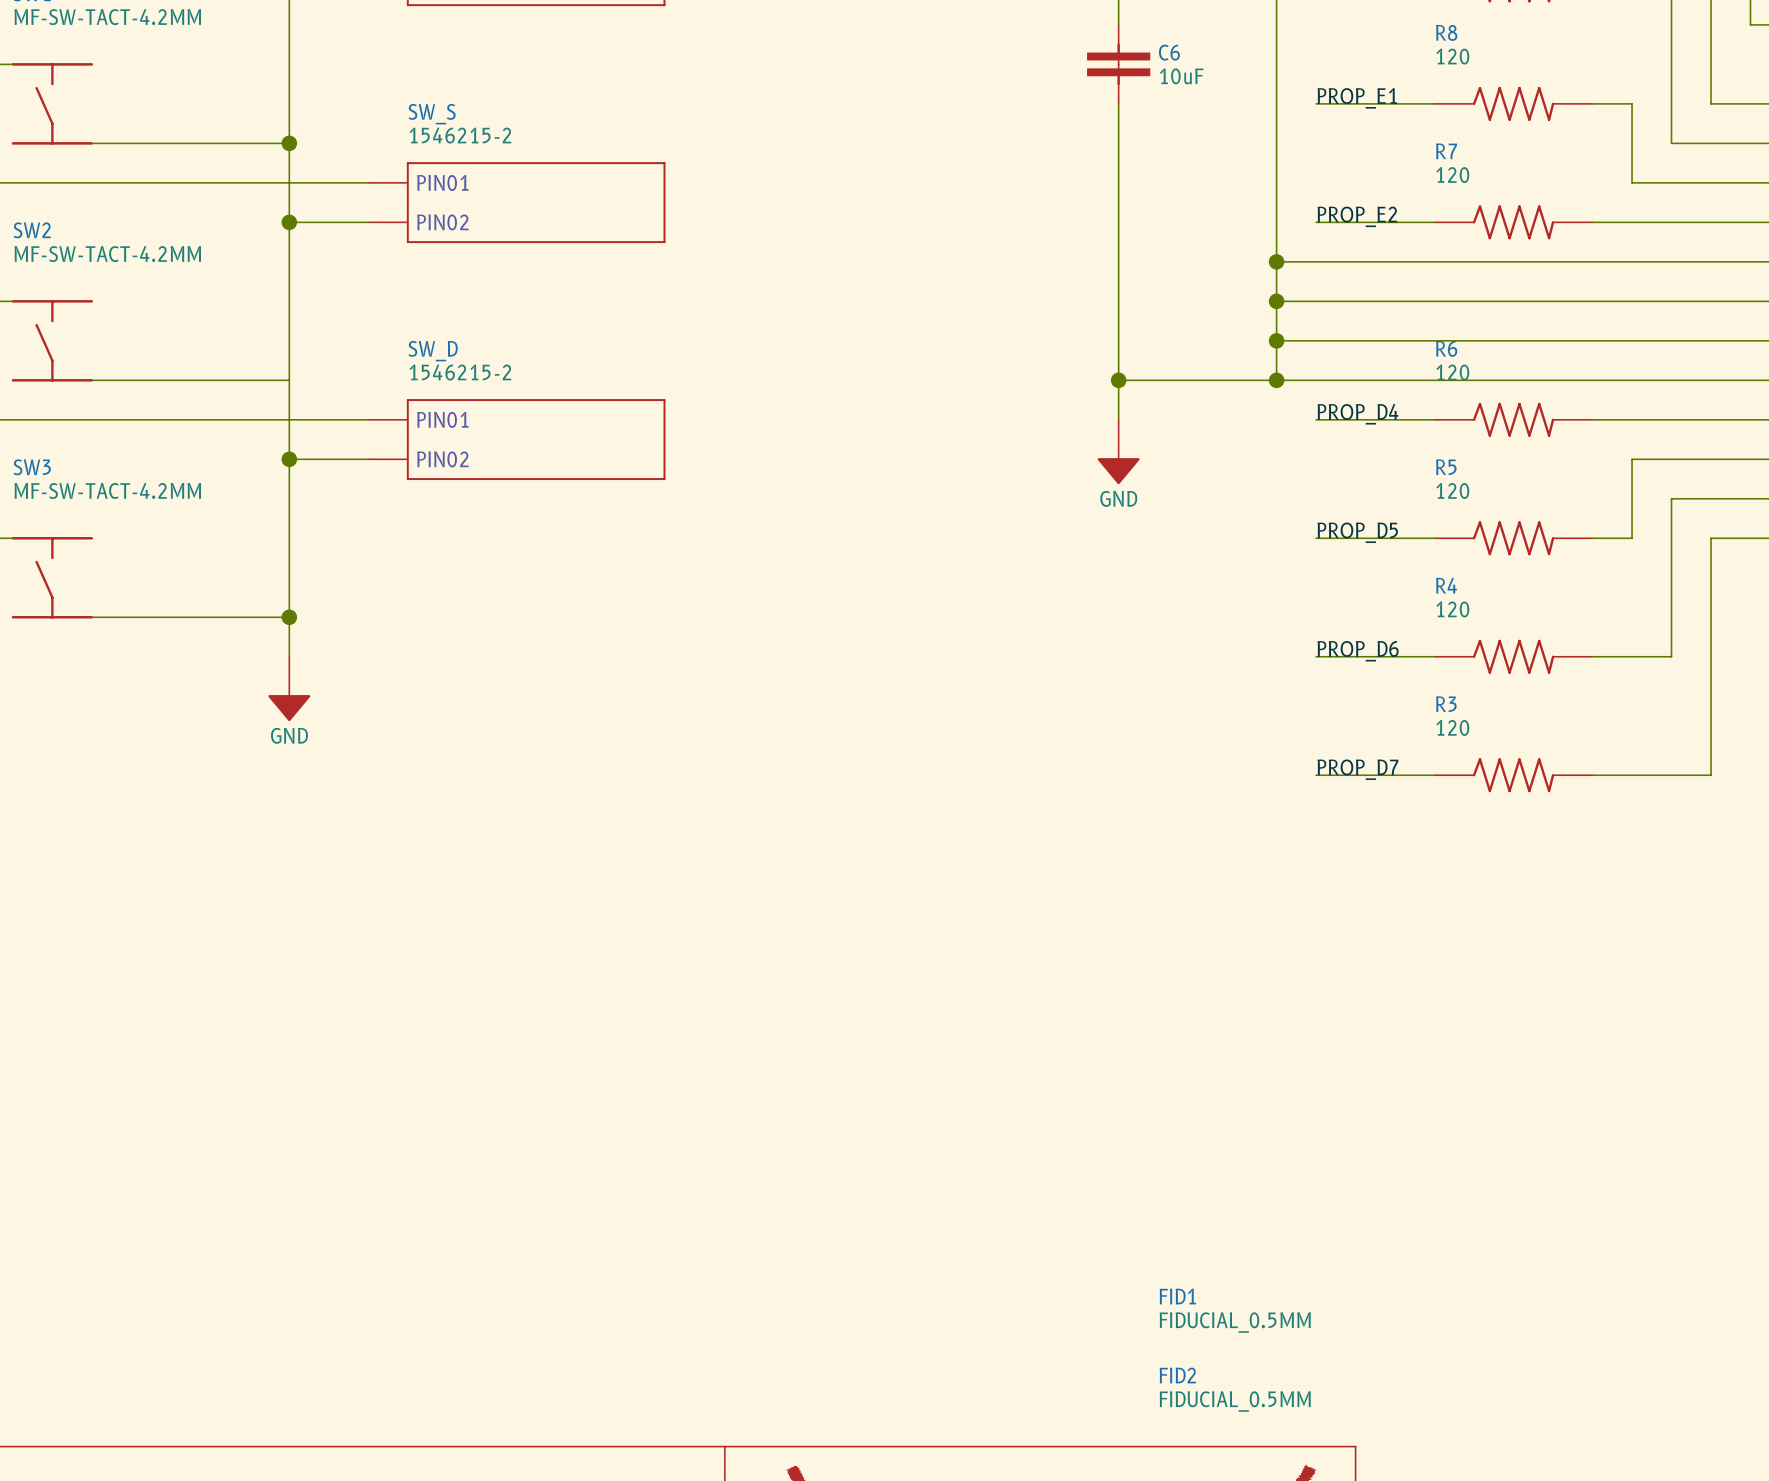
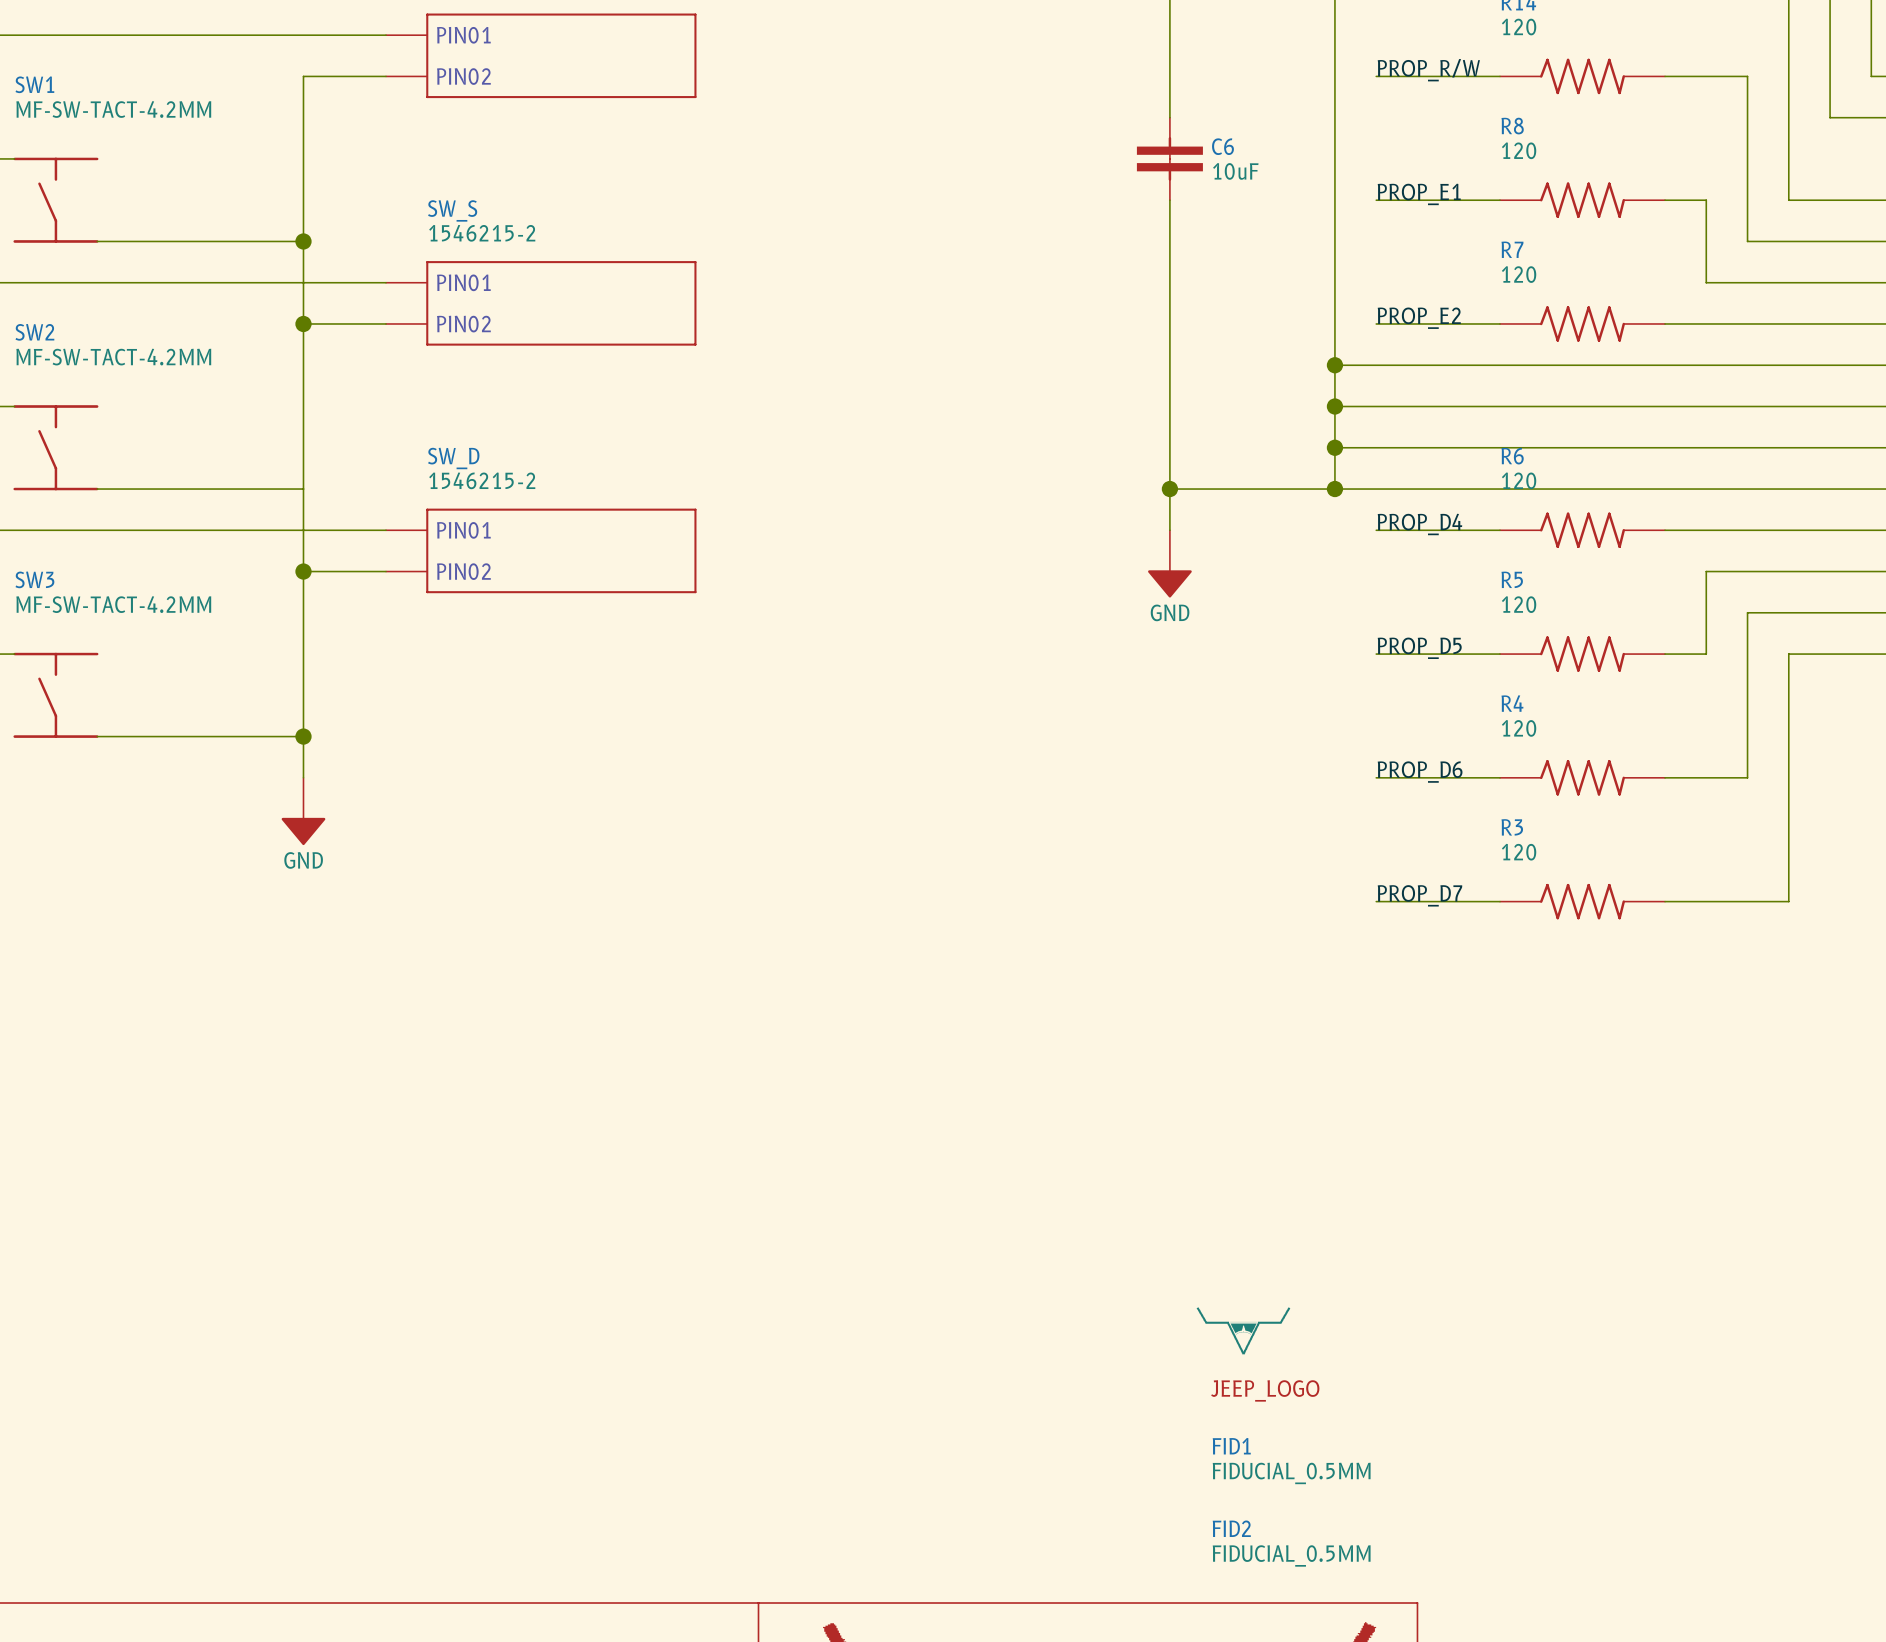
part: none -> (1243, 1330)
part: none -> (1265, 1390)

